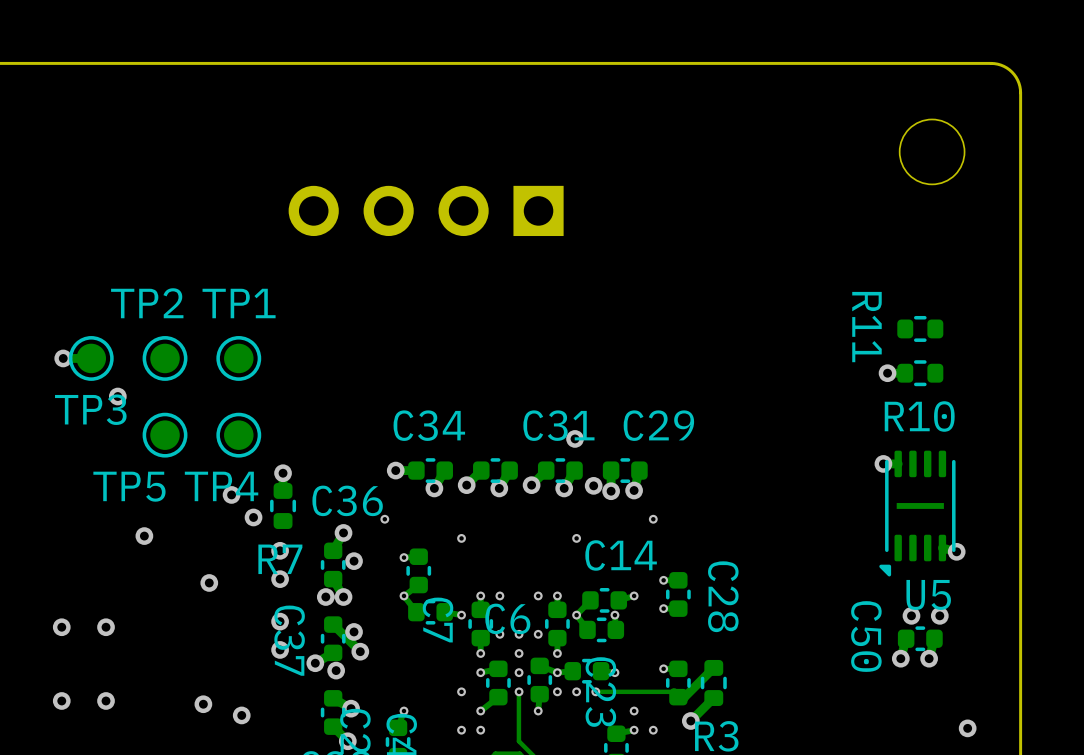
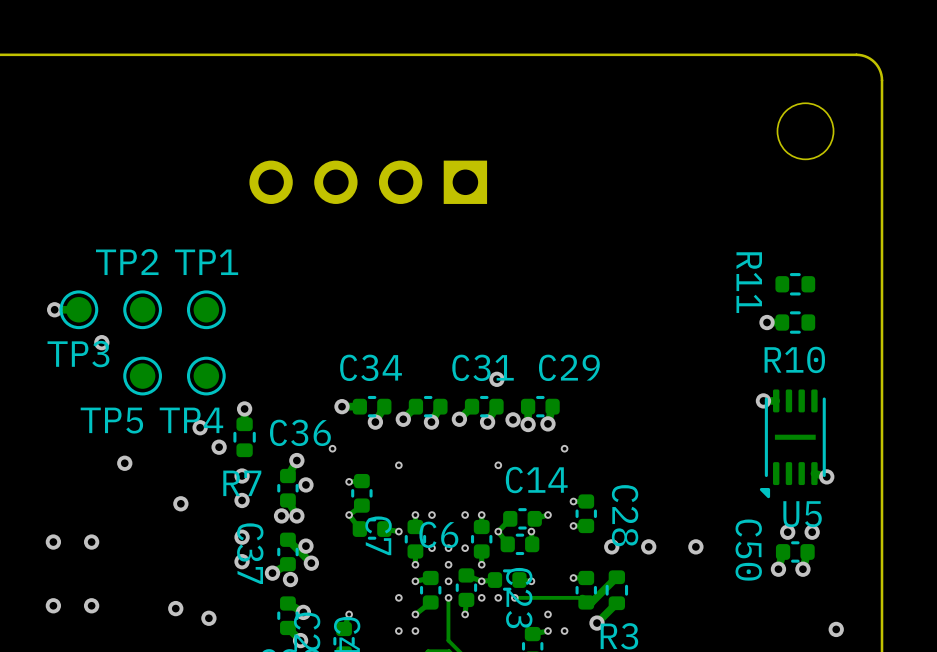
via: none -> (611, 546)
via: none -> (648, 546)
via: none -> (695, 546)

